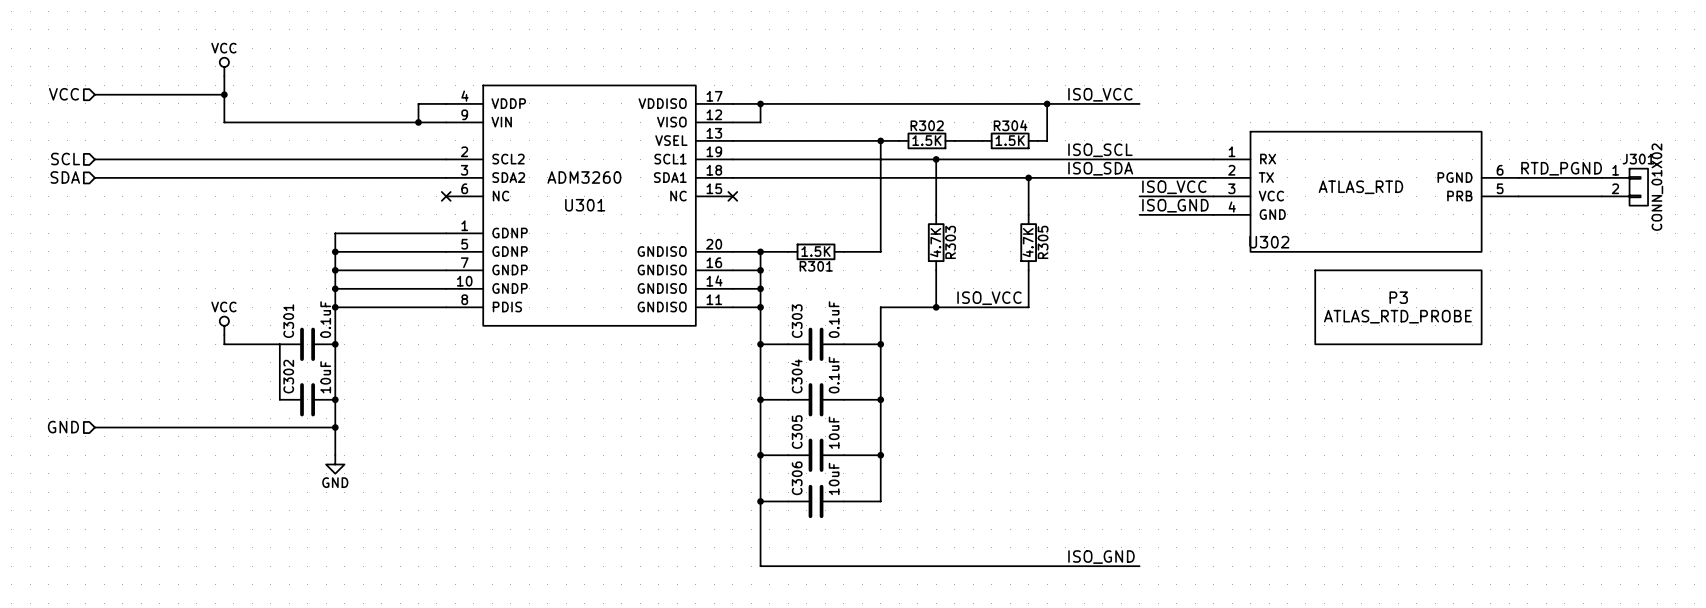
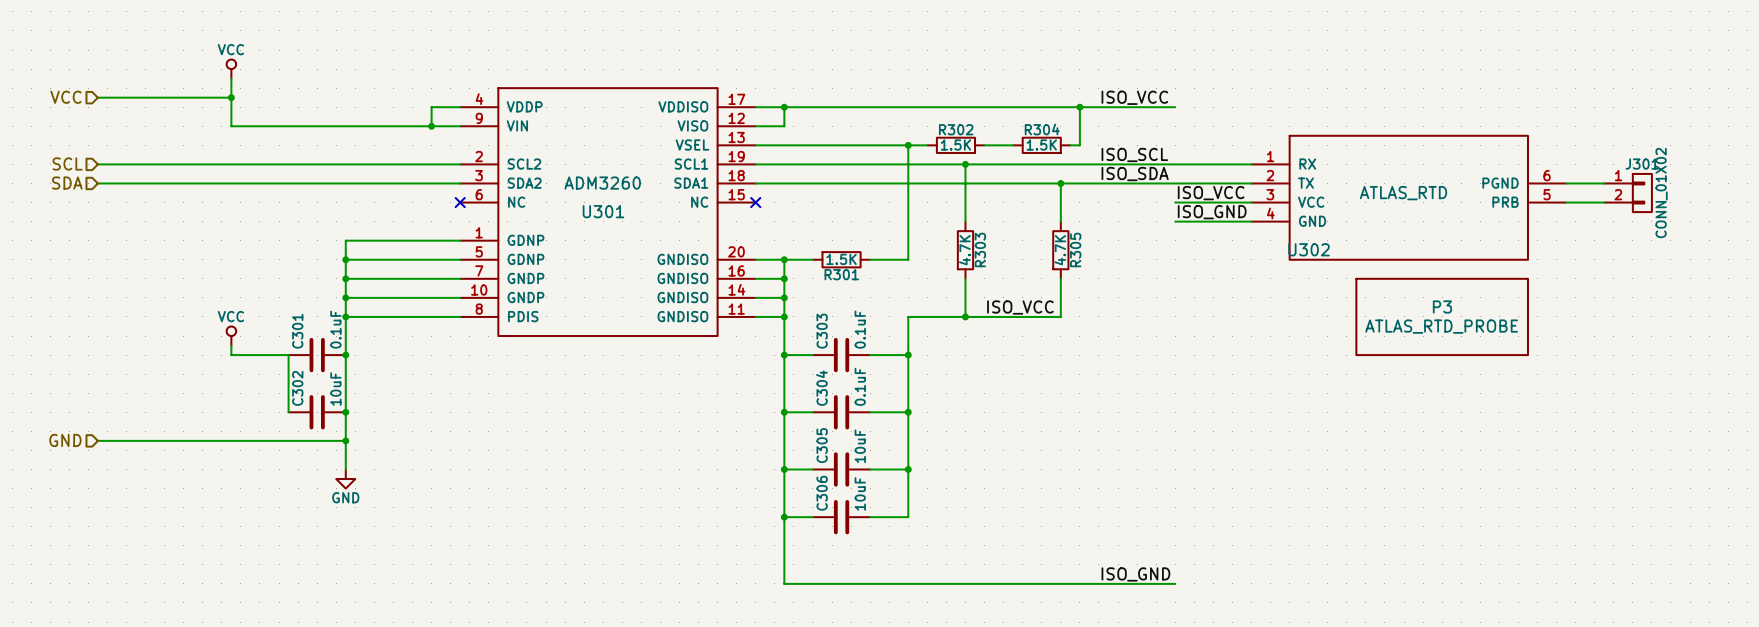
label: RTD_PGND (1561, 168) -> none
J301 position: (1624, 187) -> (1628, 193)

